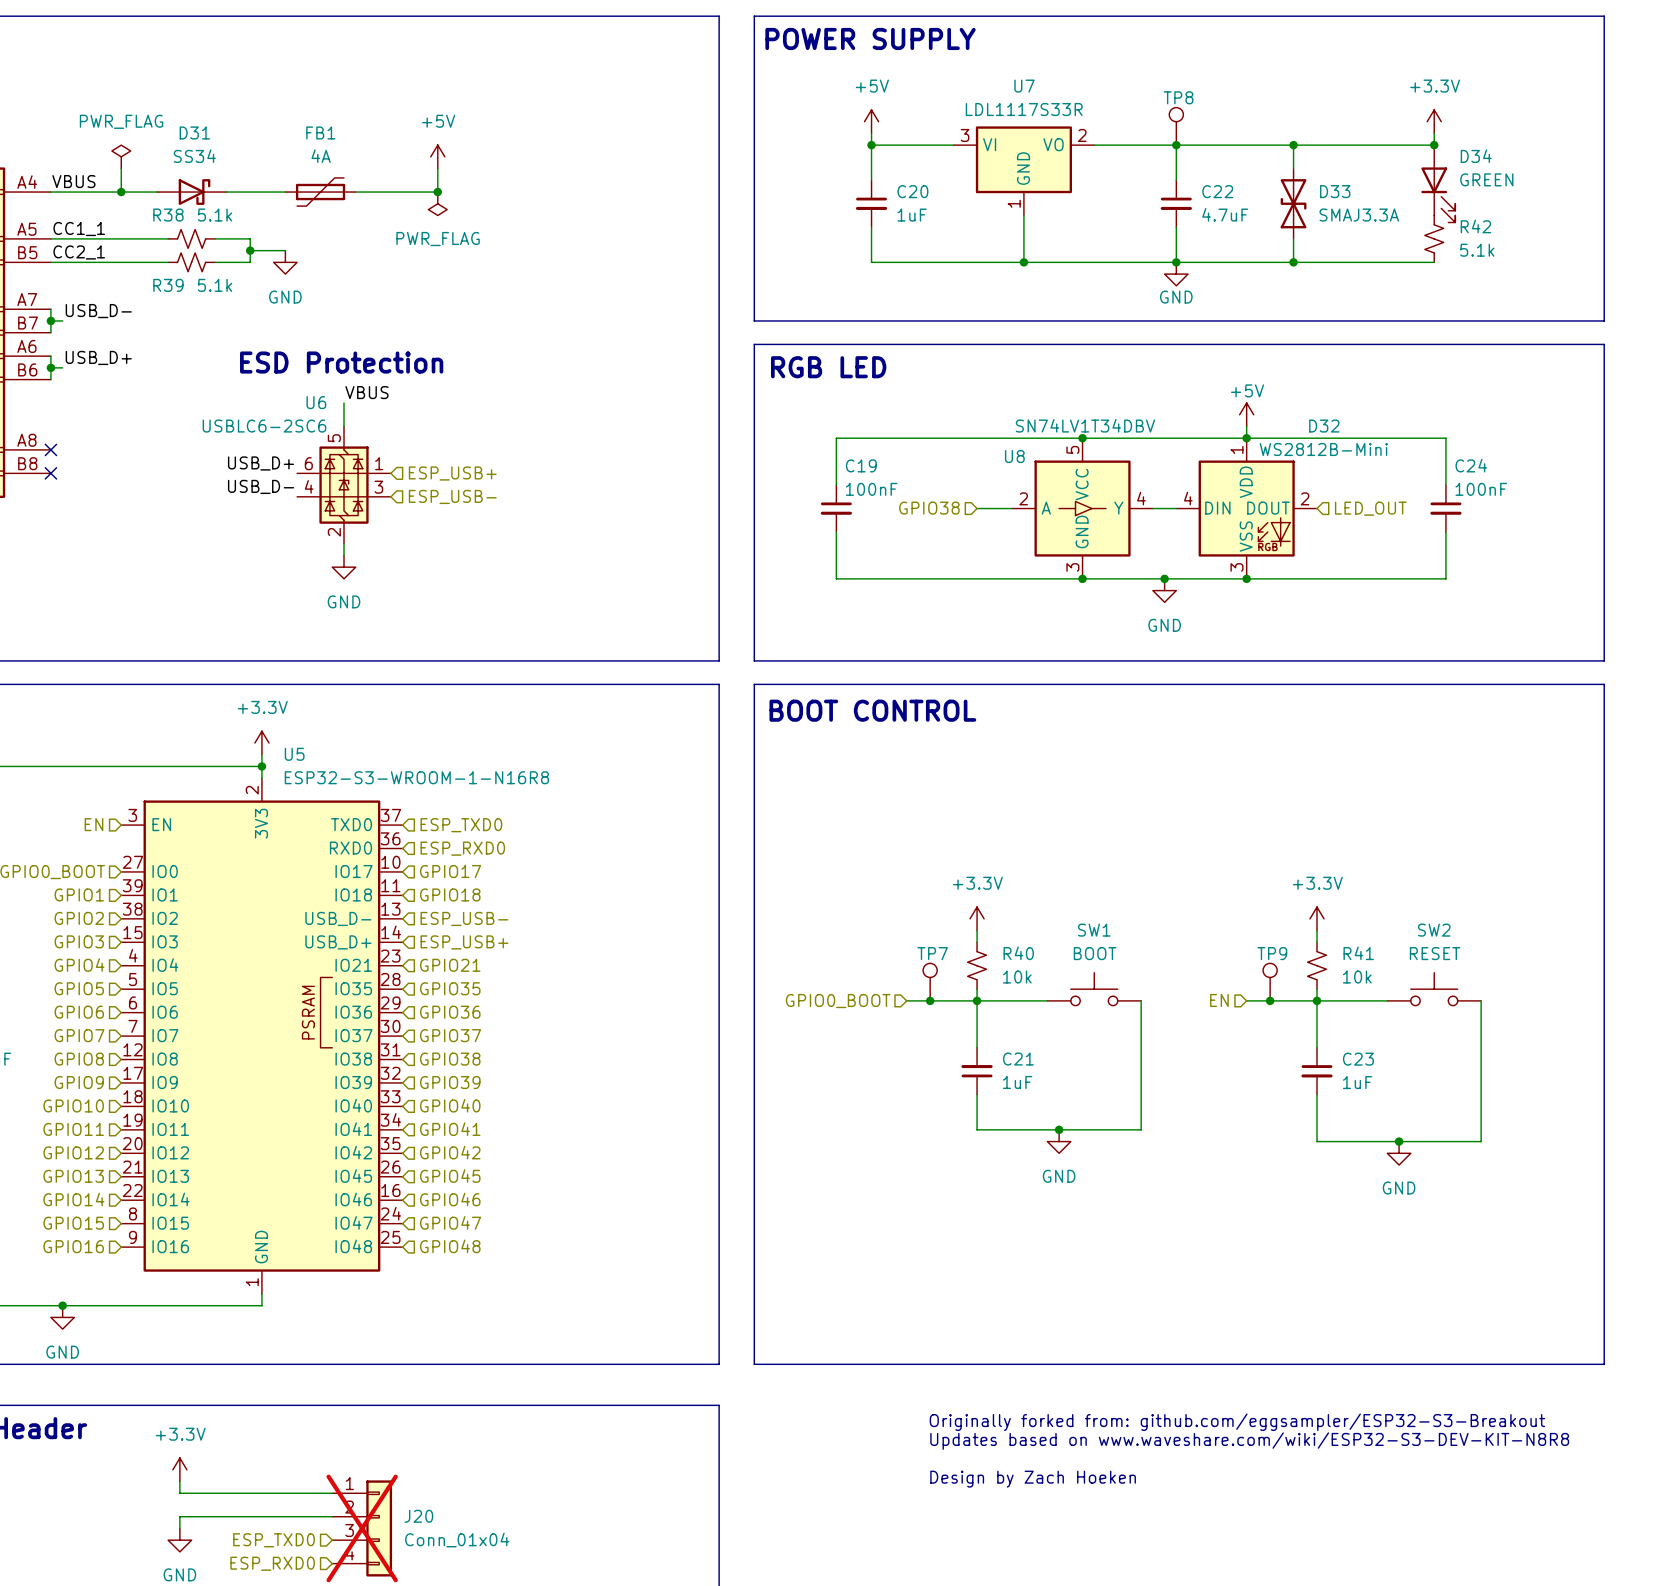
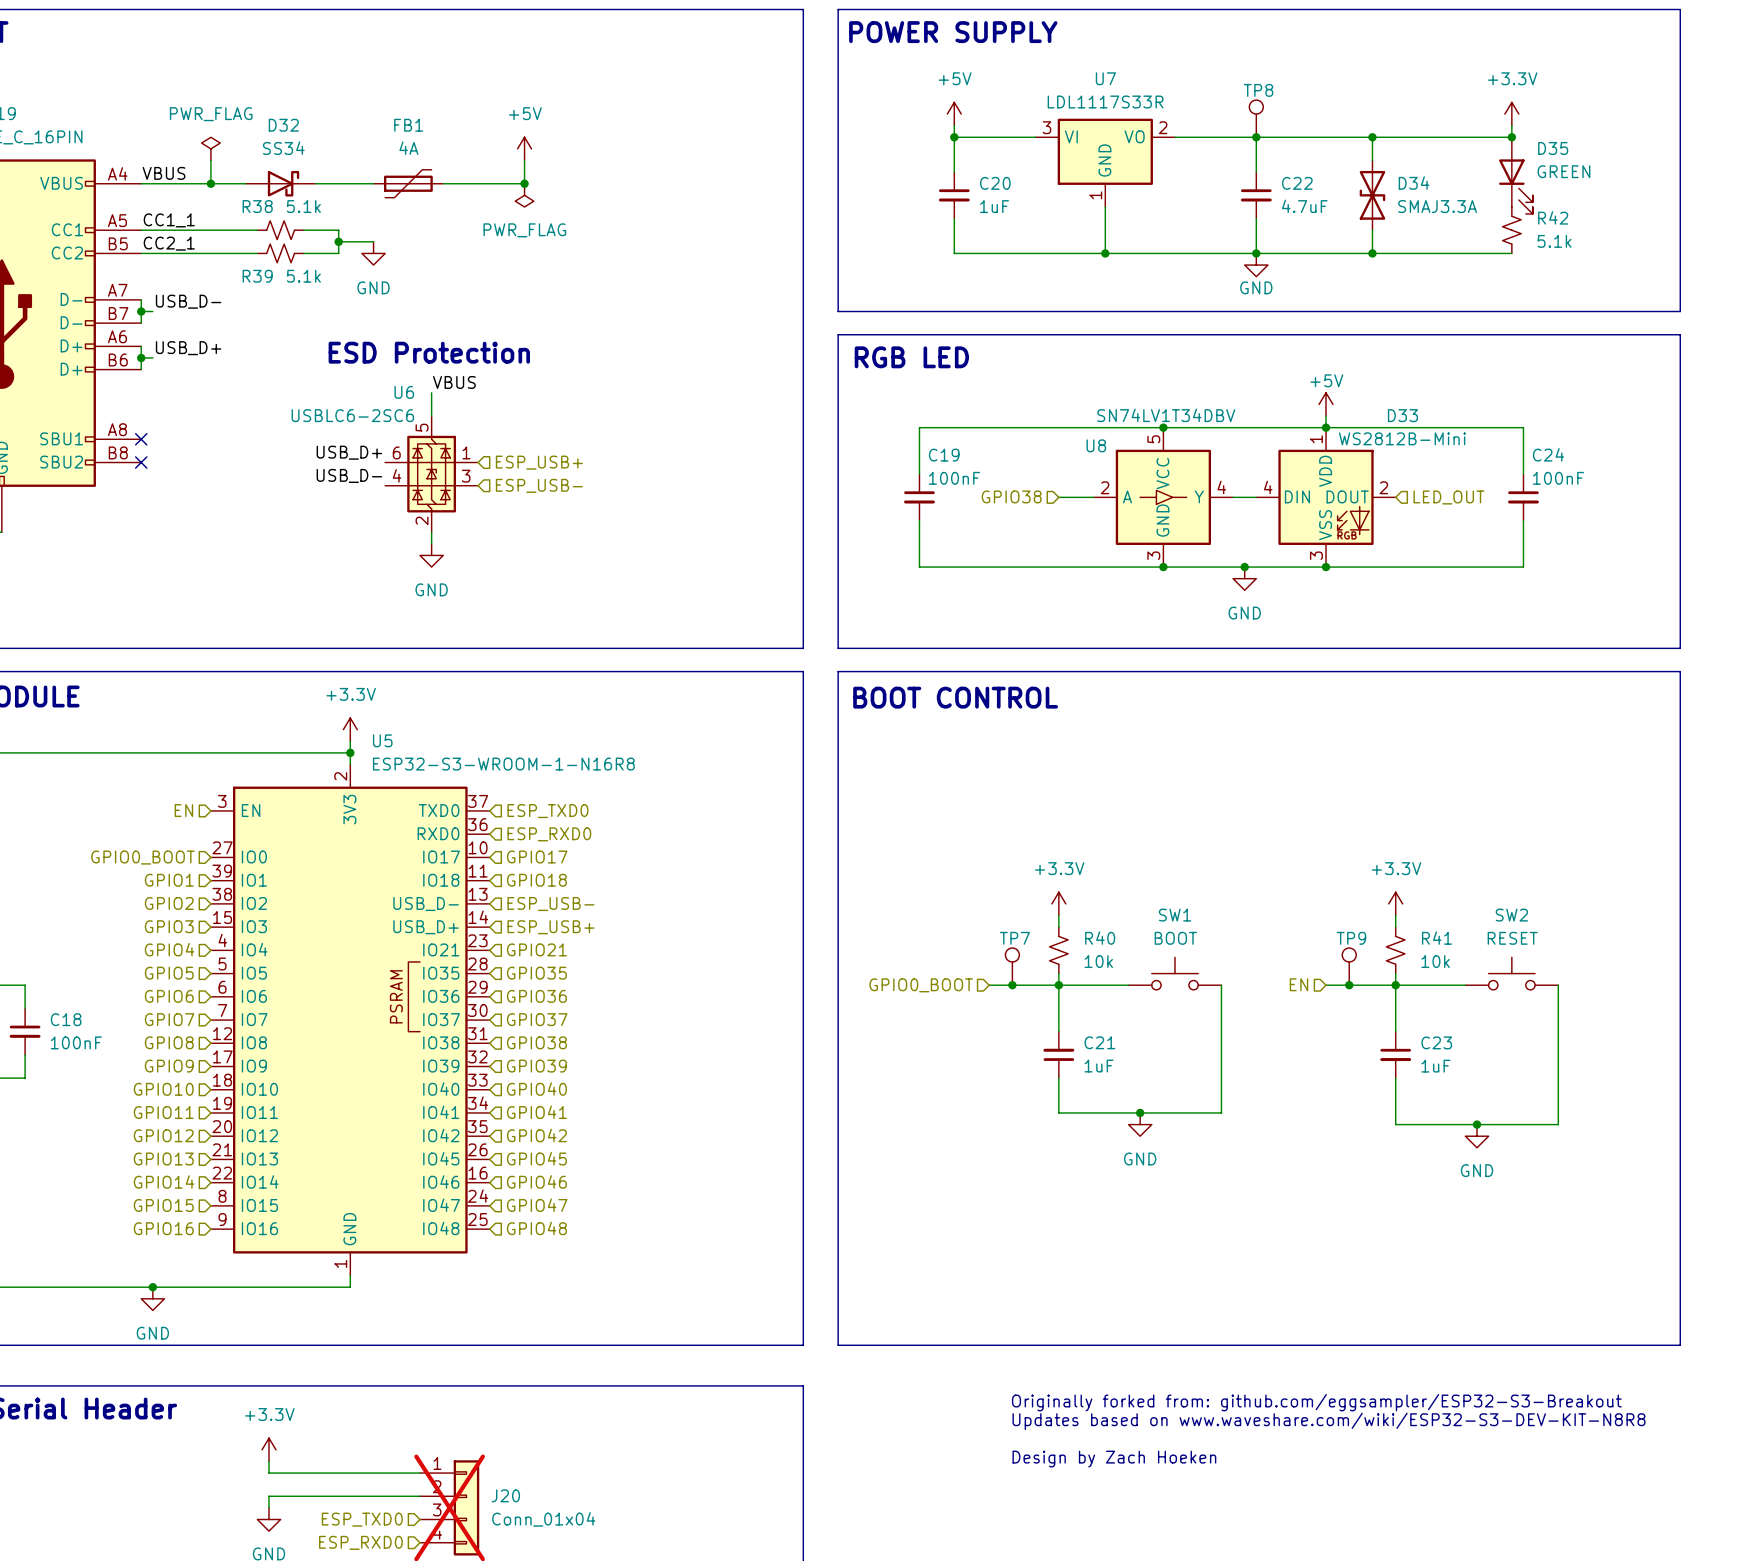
D31 name: D31 (194, 132) -> D32 (283, 125)
D34 name: D34 (1476, 156) -> D35 (1553, 148)
D33 name: D33 (1335, 191) -> D34 (1414, 183)
D32 name: D32 (1324, 426) -> D33 (1402, 415)

